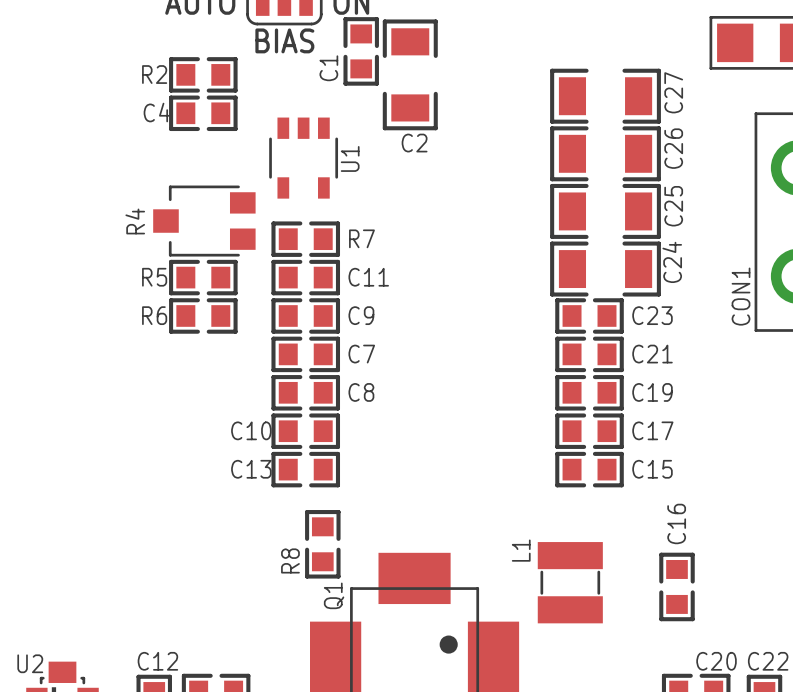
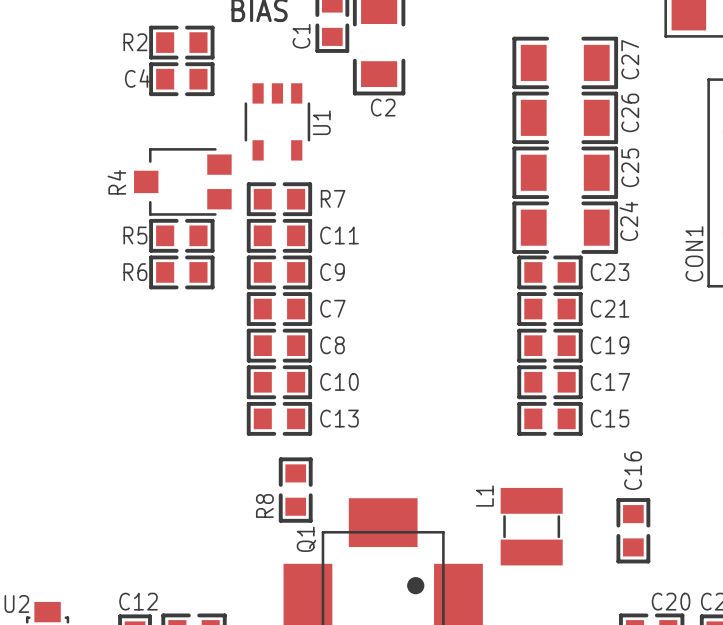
C10 name position: C10 (251, 430) -> C10 (339, 381)
C13 name position: C13 (251, 469) -> C13 (339, 418)

